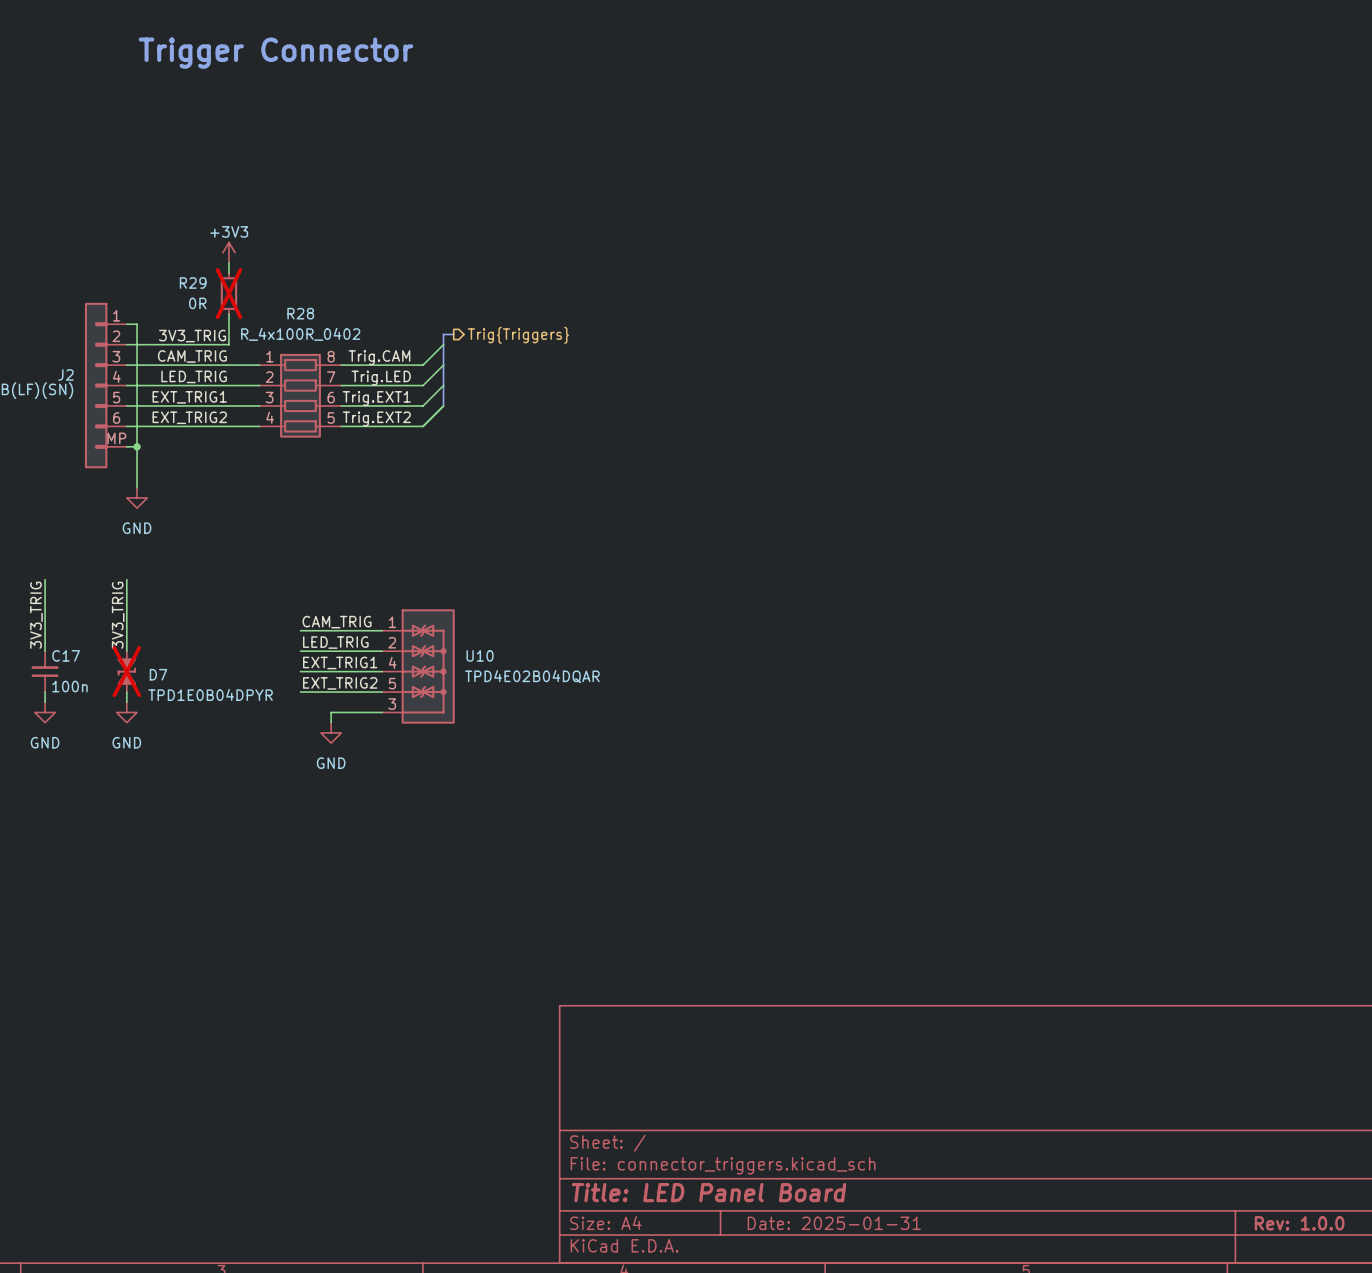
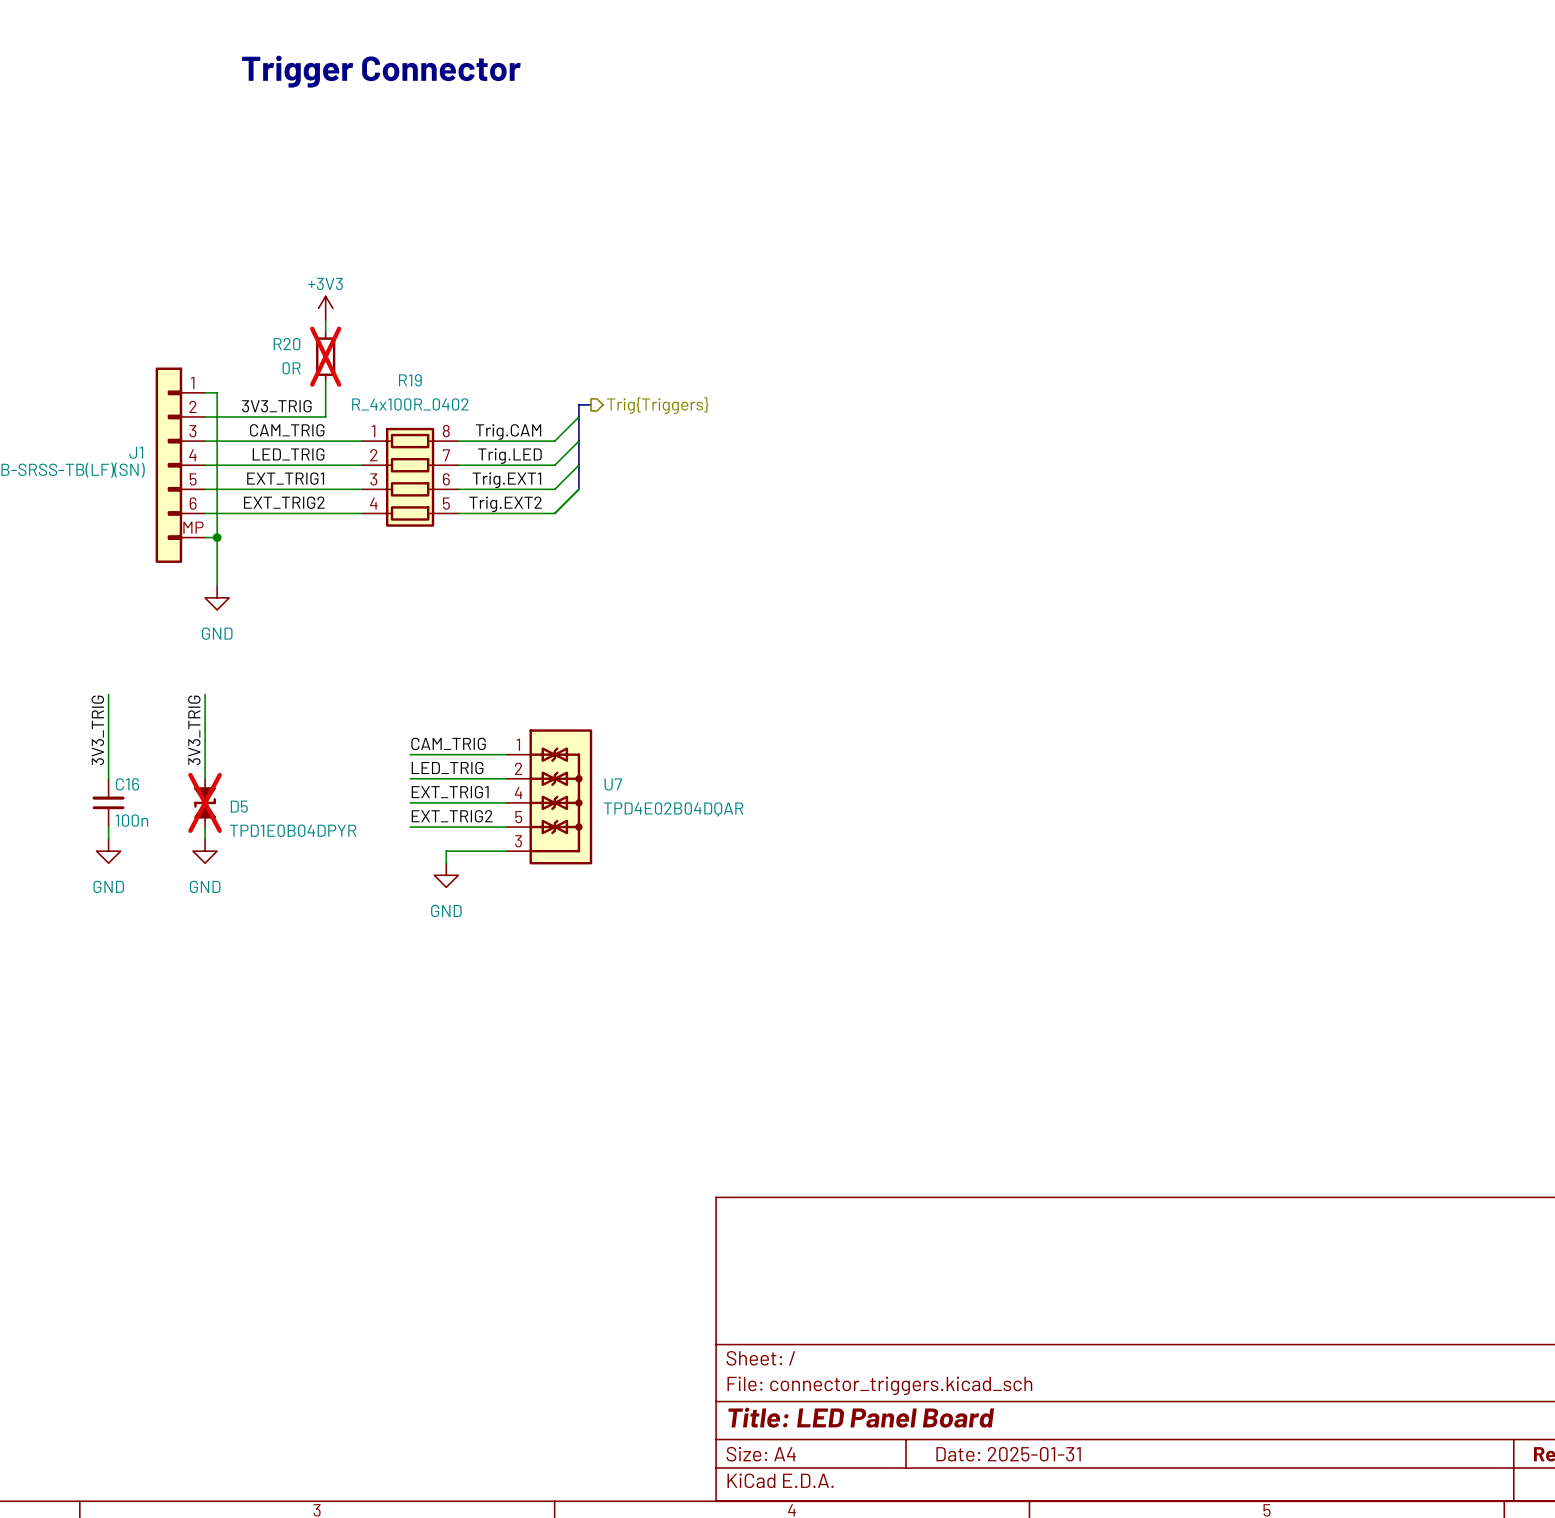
R29 name: R29 (193, 283) -> R20 (287, 344)
R28 name: R28 (300, 313) -> R19 (410, 380)
J2 name: J2 (65, 374) -> J1 (136, 452)
C17 name: C17 (66, 655) -> C16 (127, 784)
U10 name: U10 (480, 655) -> U7 (613, 784)
D7 name: D7 (158, 674) -> D5 (239, 806)

